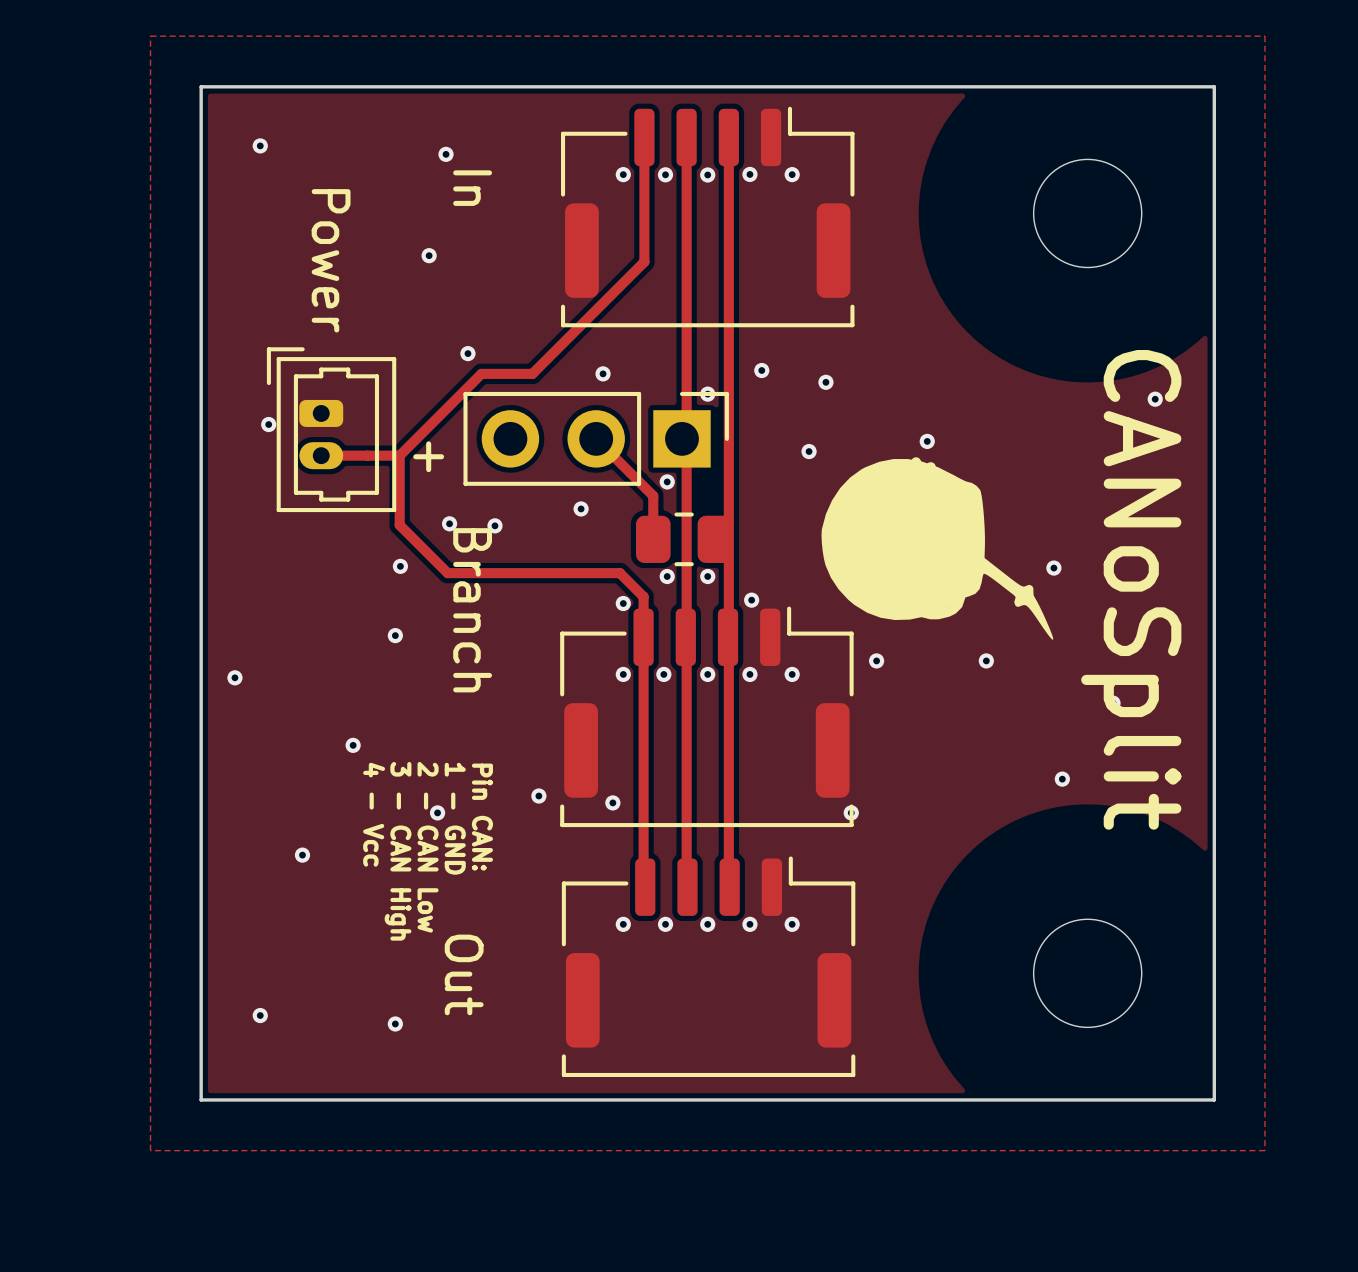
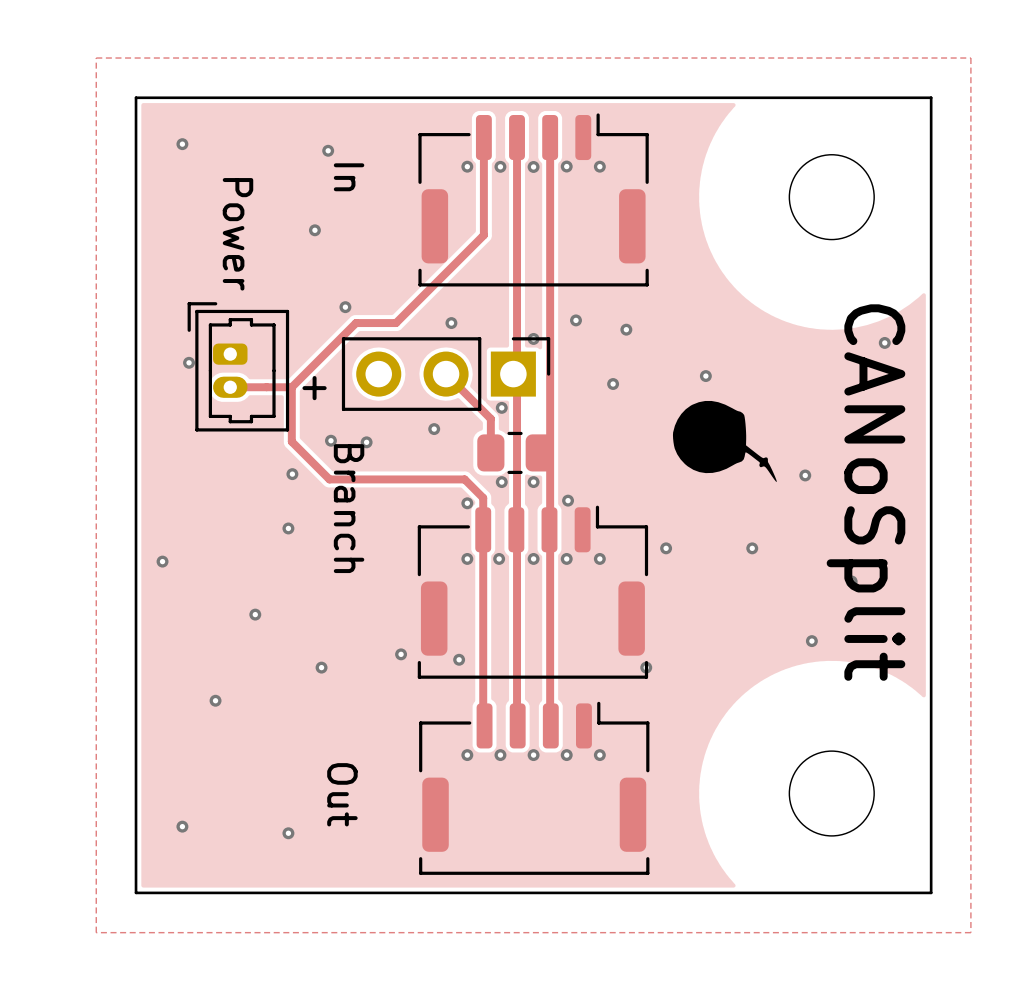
drawing: none -> [672, 400, 777, 483]
part: (937, 549) -> none
text: 4 - Vcc (374, 814) -> none
text: Pin CAN: (482, 817) -> none
text: 1 - GND (455, 818) -> none
text: 2 - CAN Low (428, 847) -> none
text: 3 - CAN High (398, 851) -> none

